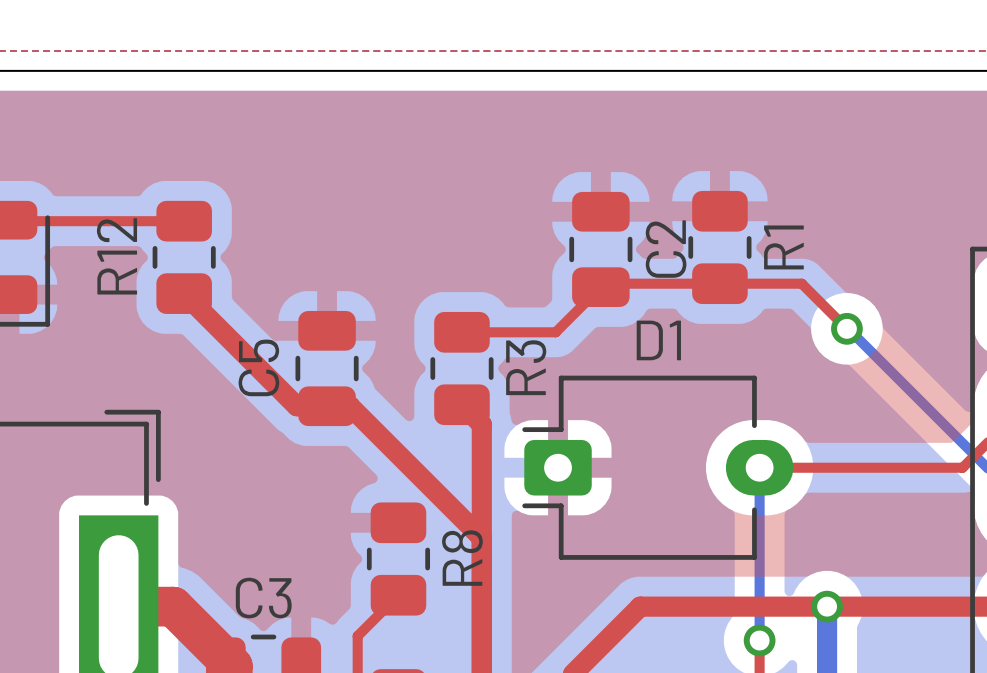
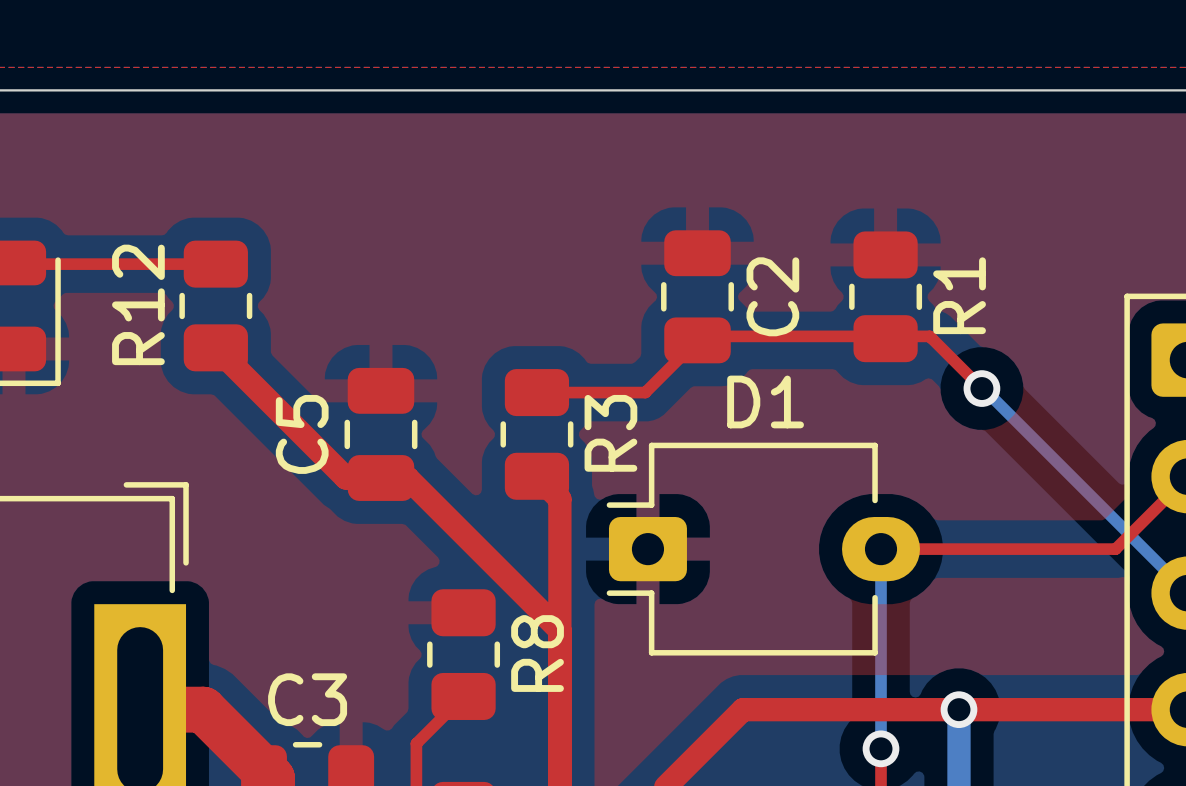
R1 position: (719, 247) -> (885, 296)

